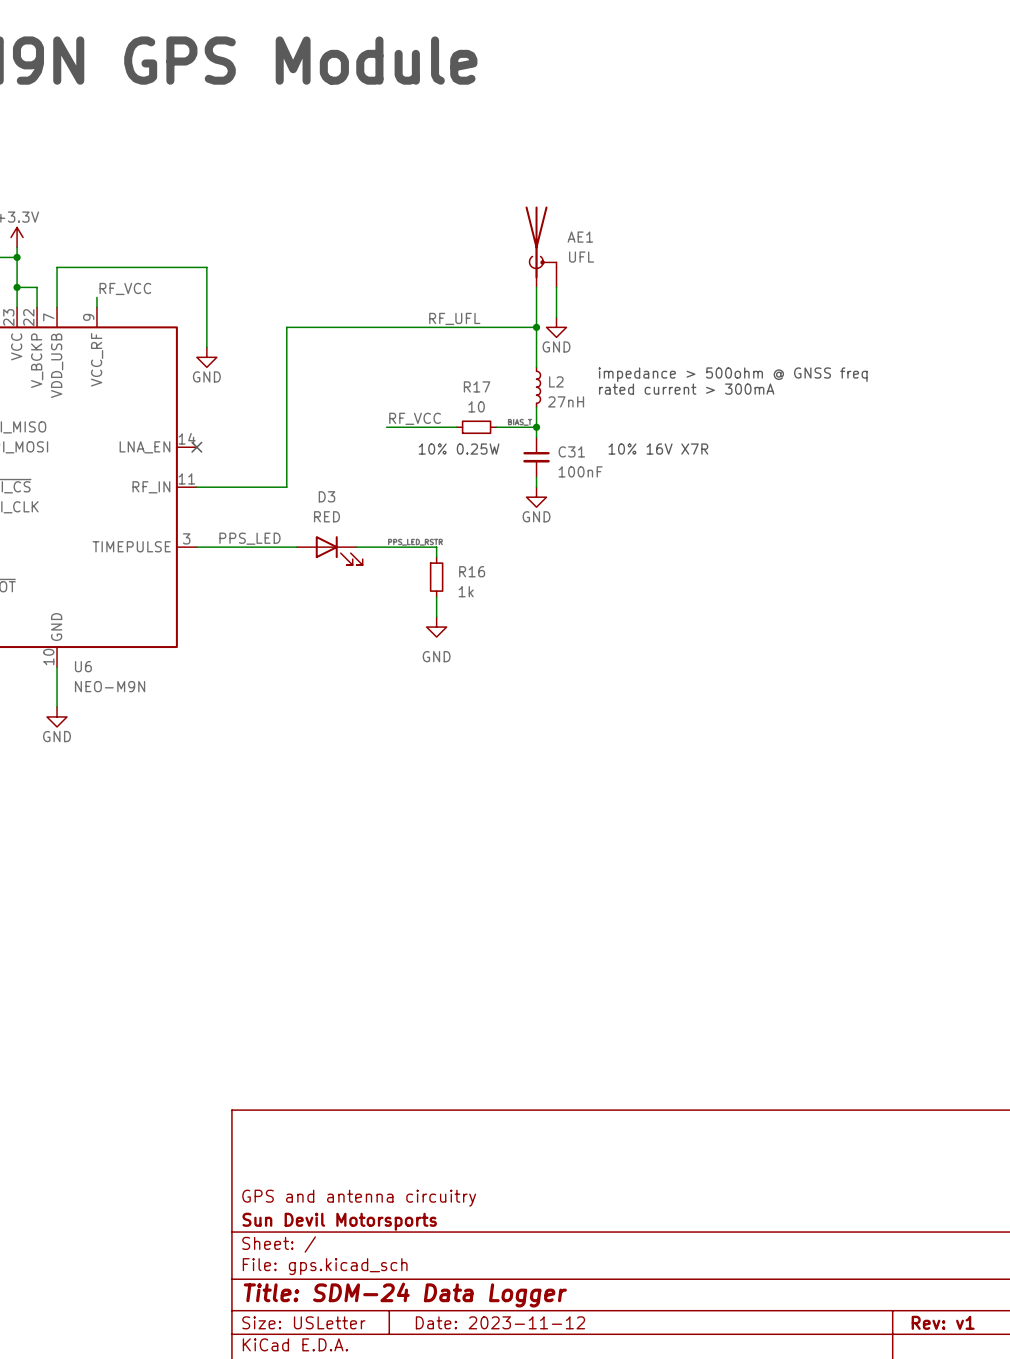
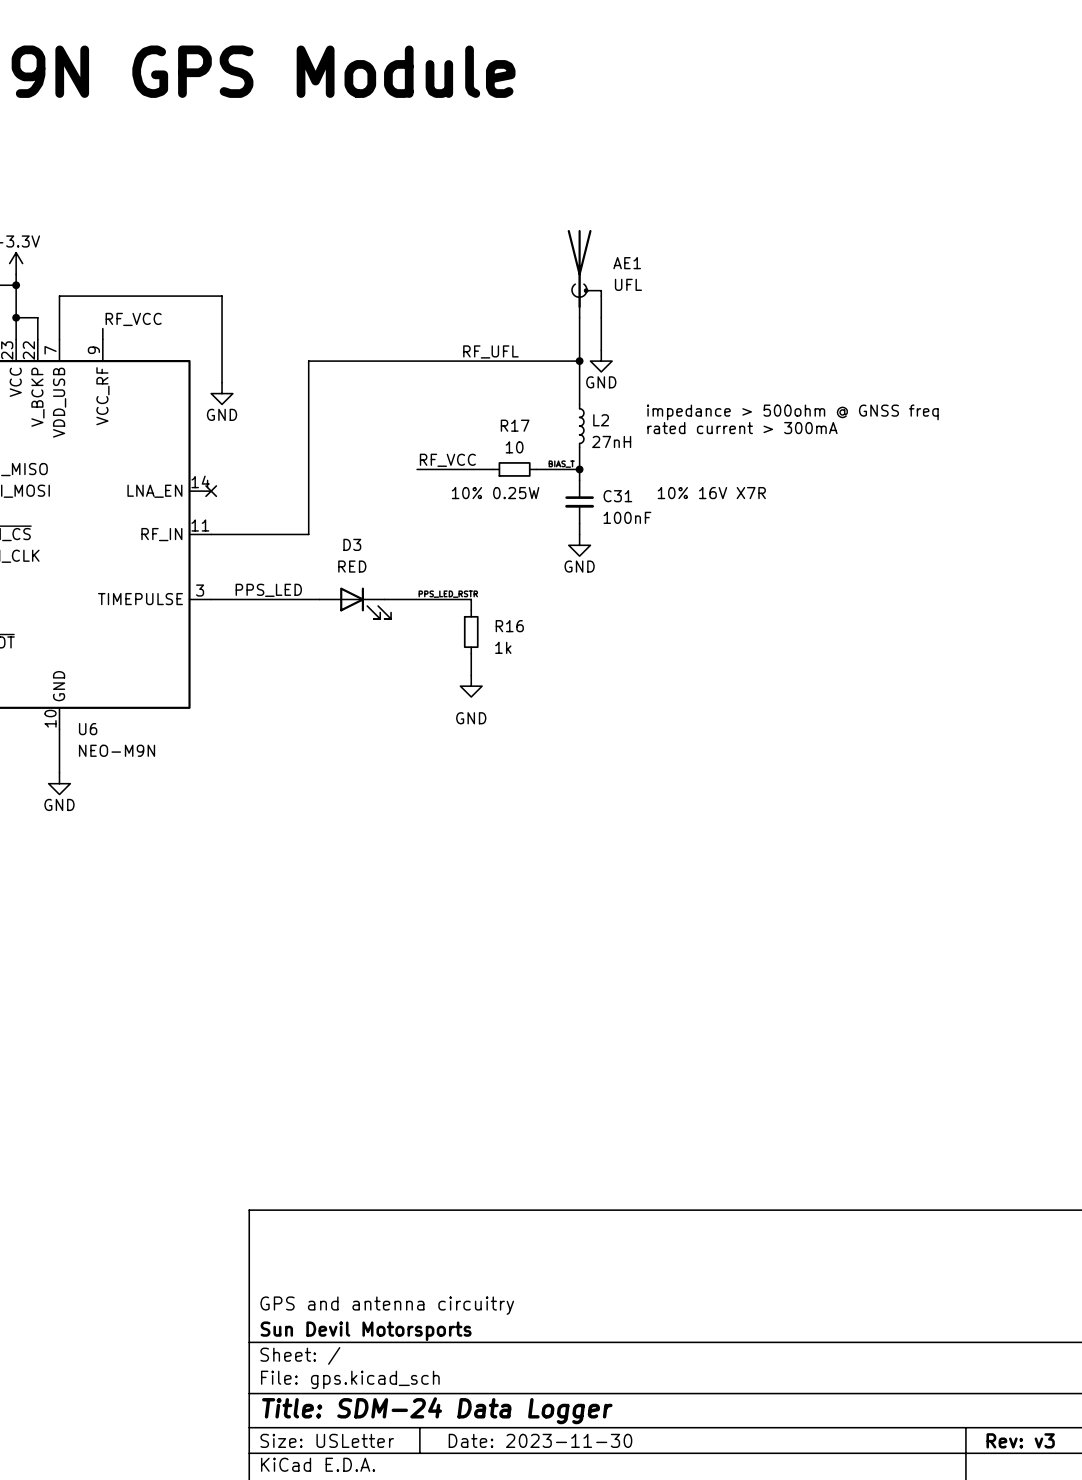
title block: Date: 2023-11-12 (500, 1322) -> Date: 2023-11-30 (540, 1440)
title block: Rev: v1 (943, 1322) -> Rev: v3 (1020, 1440)

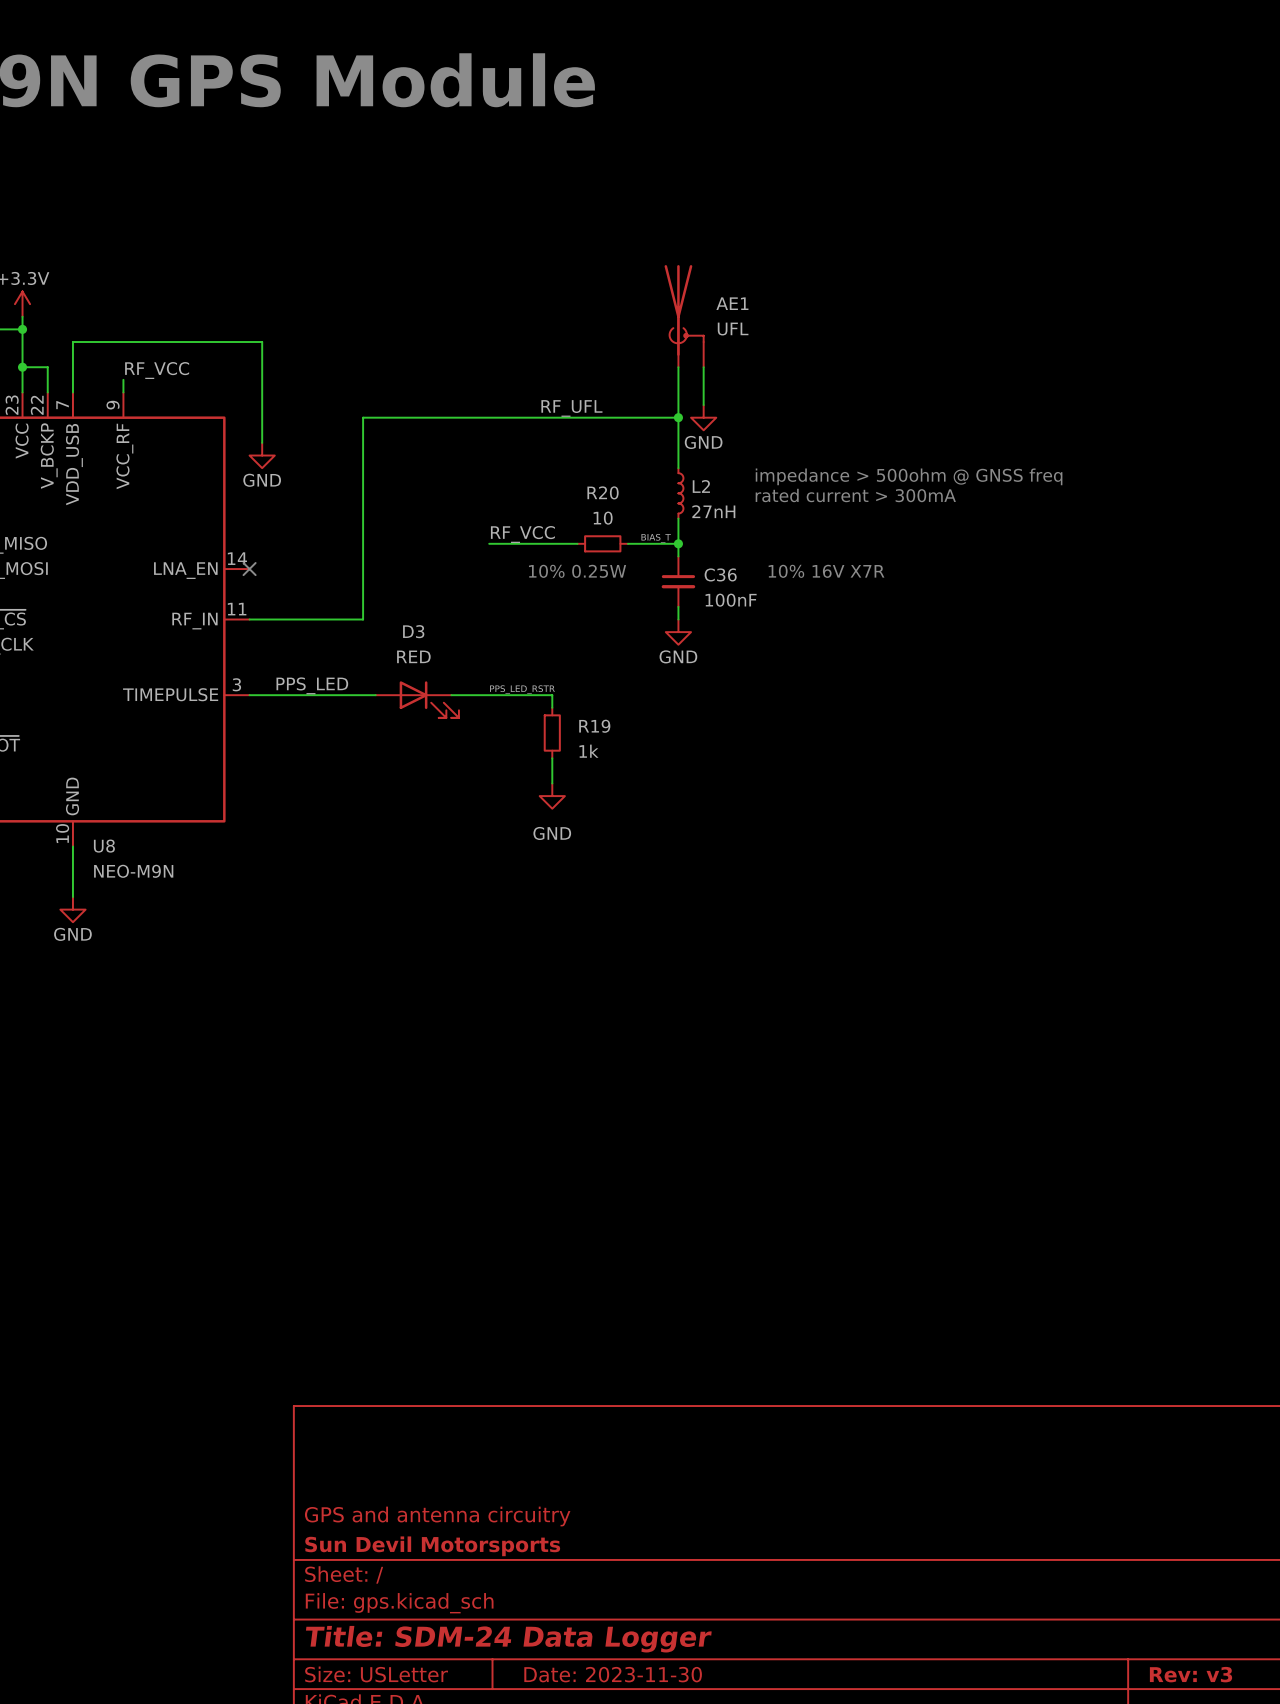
R17 name: R17 (515, 425) -> R20 (603, 492)
C31 name: C31 (617, 496) -> C36 (720, 574)
R16 name: R16 (509, 626) -> R19 (594, 726)
U6 name: U6 (88, 729) -> U8 (104, 846)

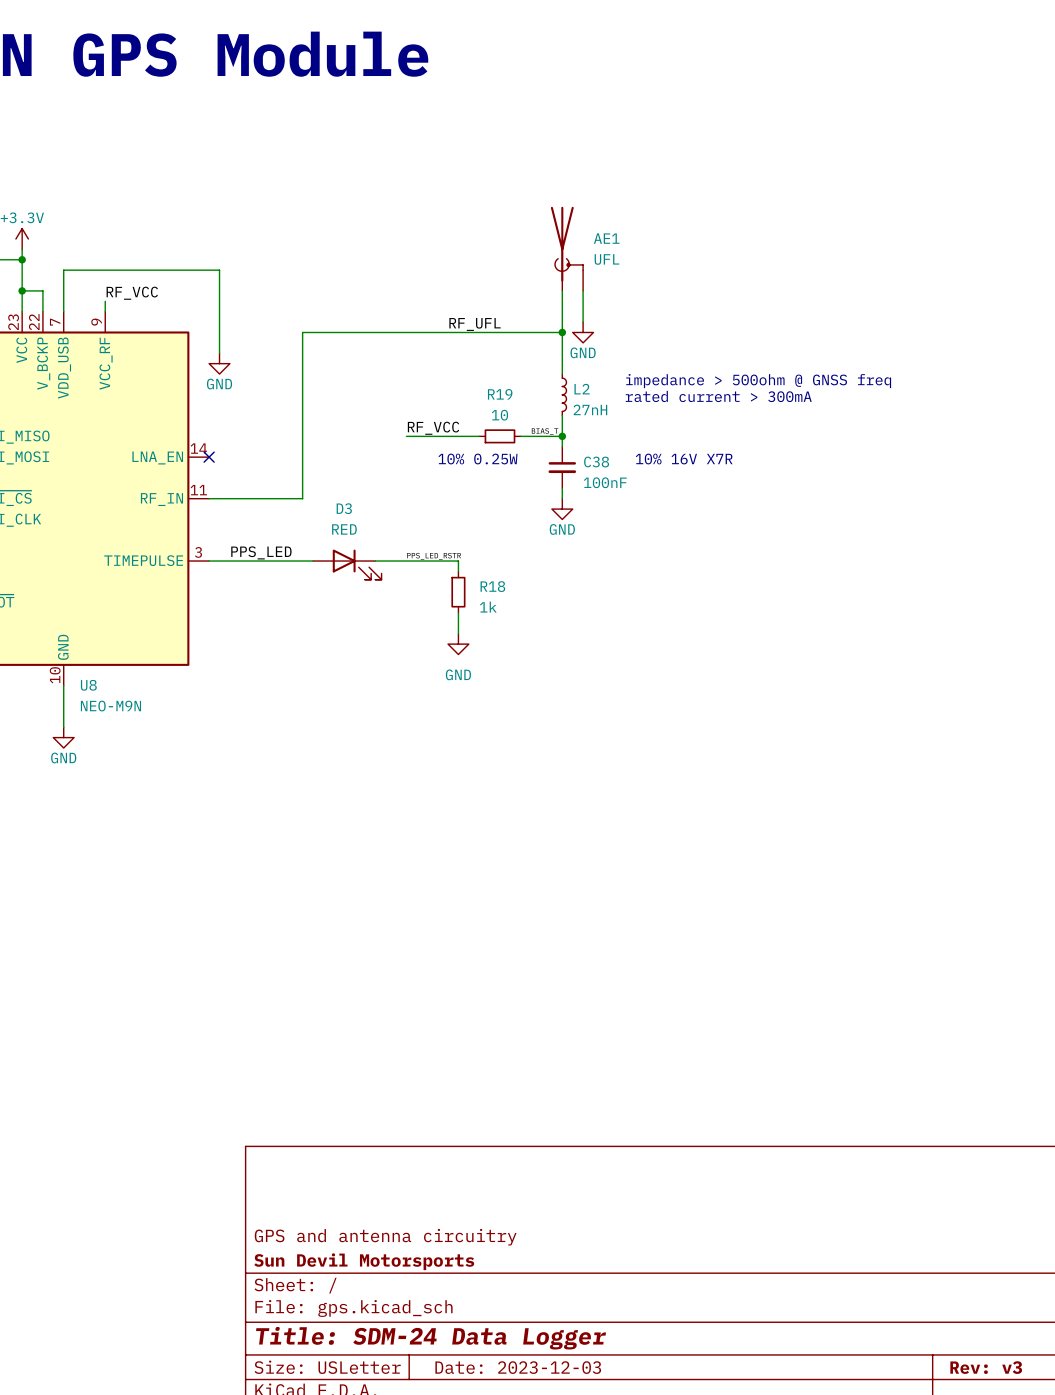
R20 name: R20 (603, 492) -> R19 (500, 394)
C36 name: C36 (720, 574) -> C38 (596, 461)
R19 name: R19 (594, 726) -> R18 (492, 586)
title block: Date: 2023-11-30 (613, 1674) -> Date: 2023-12-03 (518, 1367)

